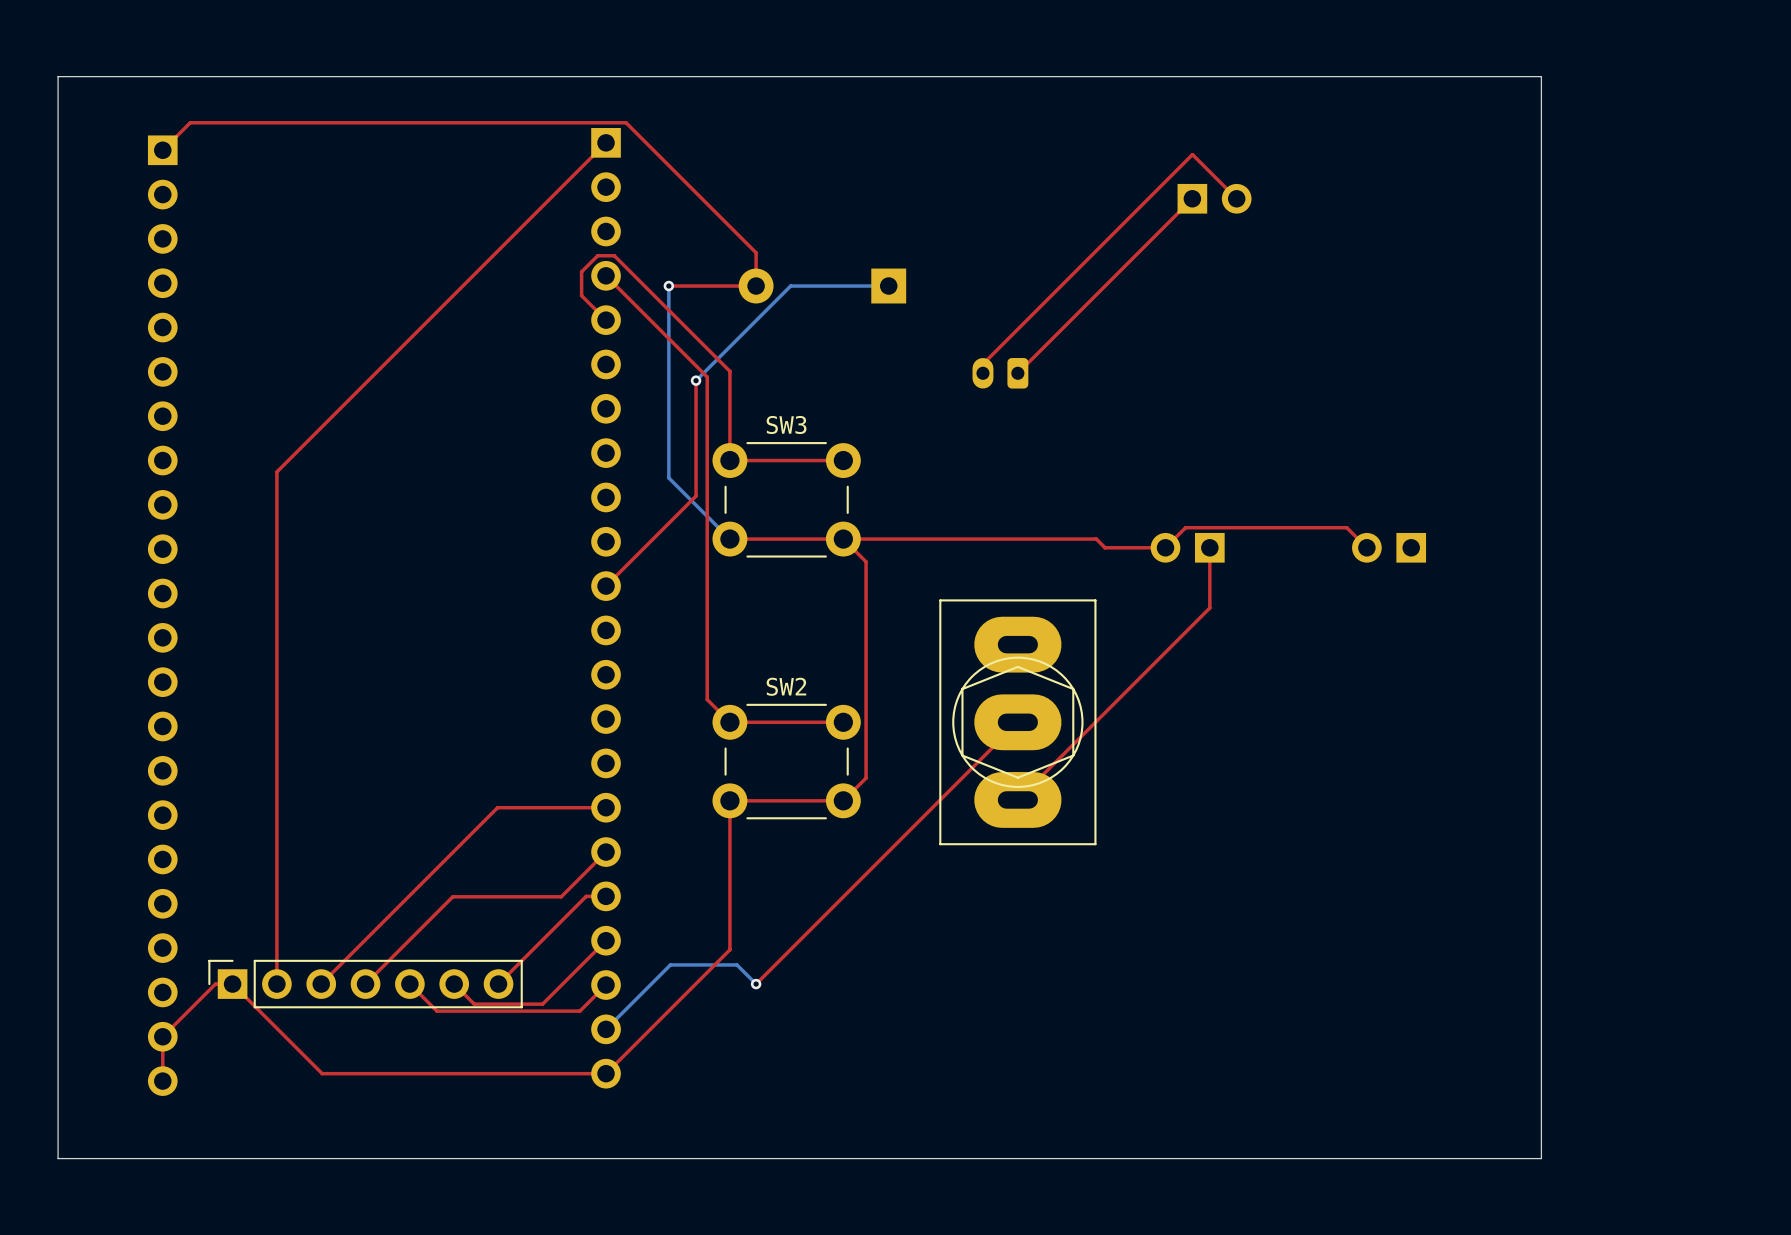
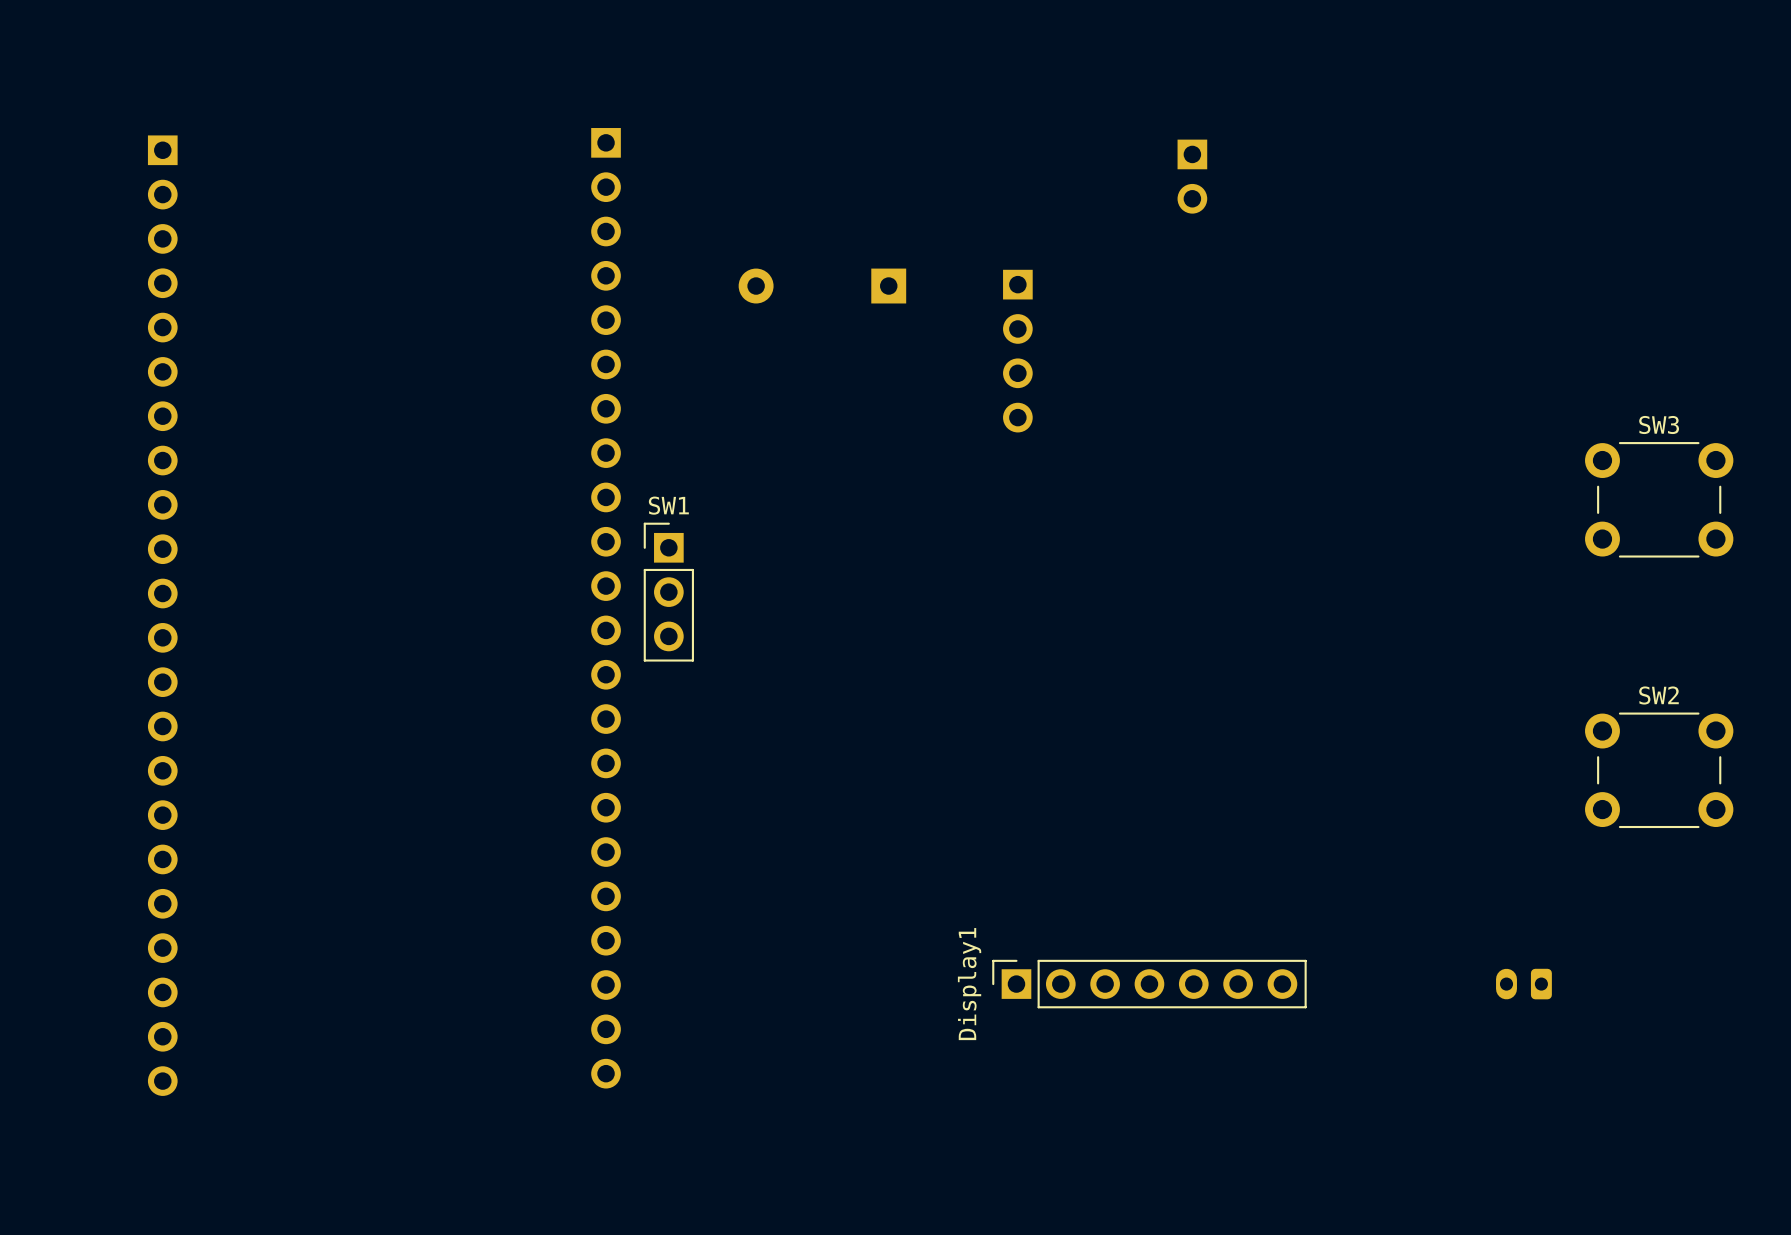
board edge: (58, 76) (1541, 76) (1541, 1158) (58, 1158) (58, 76) -> none
top track: (606, 142) (276, 471) (276, 984) -> none
top track: (162, 150) (190, 122) (626, 122) (756, 252) (756, 286) (668, 286) -> none
top track: (1192, 154) (982, 364) (982, 373) -> none
top track: (1192, 154) (1236, 198) -> none
top track: (1192, 198) (1017, 373) -> none
part rotation: 0° (1214, 198) -> 90° clockwise (1192, 176)
top track: (606, 275) (707, 377) (707, 699) (729, 722) (843, 722) -> none
bottom track: (668, 286) (668, 477) (729, 539) -> none
via: (668, 286) -> none
bottom track: (888, 286) (790, 286) (696, 380) -> none
top track: (606, 320) (581, 295) (581, 271) (597, 255) (614, 255) (729, 371) (729, 460) (843, 460) -> none
part: none -> (1017, 351)
part: (1000, 373) -> none
top track: (696, 380) (696, 496) (606, 586) -> none
via: (696, 380) -> none
SW3 position: (786, 499) -> (1659, 499)
top track: (729, 539) (1096, 539) (1105, 547) (1165, 547) (1185, 527) (1346, 527) (1366, 547) -> none
top track: (843, 539) (866, 561) (866, 778) (843, 800) (729, 800) (729, 949) (606, 1073) (322, 1073) (232, 984) (215, 984) (162, 1036) (162, 1081) -> none
part: (1187, 547) -> none
top track: (1209, 547) (1209, 608) (1017, 799) -> none
part: (1389, 547) -> none
SW1: none -> (668, 592)
top track: (1017, 722) (756, 984) -> none
part: (1017, 722) -> none
SW2 position: (786, 761) -> (1659, 770)
top track: (606, 807) (497, 807) (321, 984) -> none
top track: (606, 852) (561, 896) (452, 896) (365, 984) -> none
top track: (606, 896) (586, 896) (498, 984) -> none
top track: (606, 940) (542, 1004) (474, 1004) (454, 984) -> none
part: (365, 984) -> none
top track: (409, 984) (436, 1011) (579, 1011) (606, 985) -> none
bottom track: (756, 984) (737, 964) (670, 964) (606, 1029) -> none
via: (756, 984) -> none
Display1: none -> (1149, 984)
part: none -> (1523, 984)

